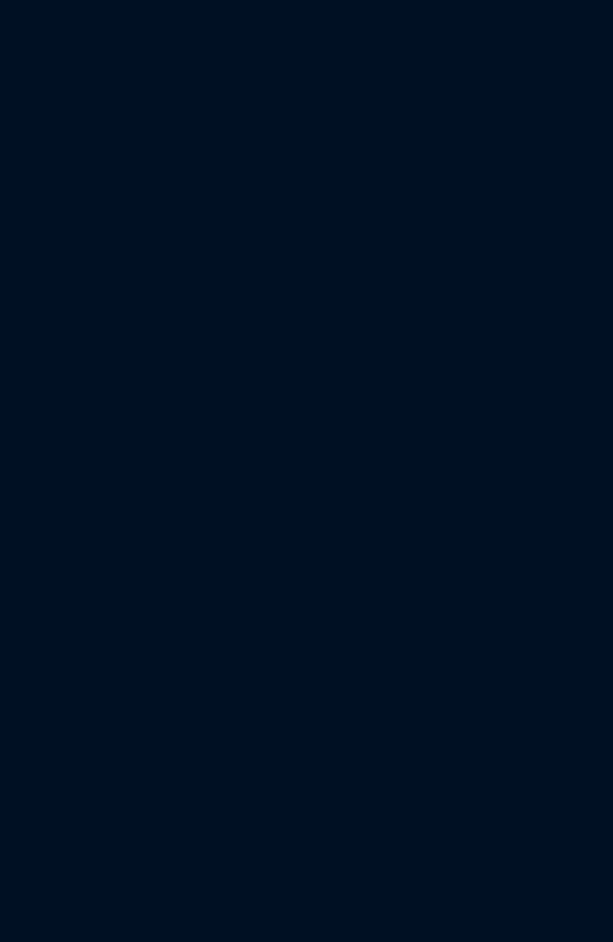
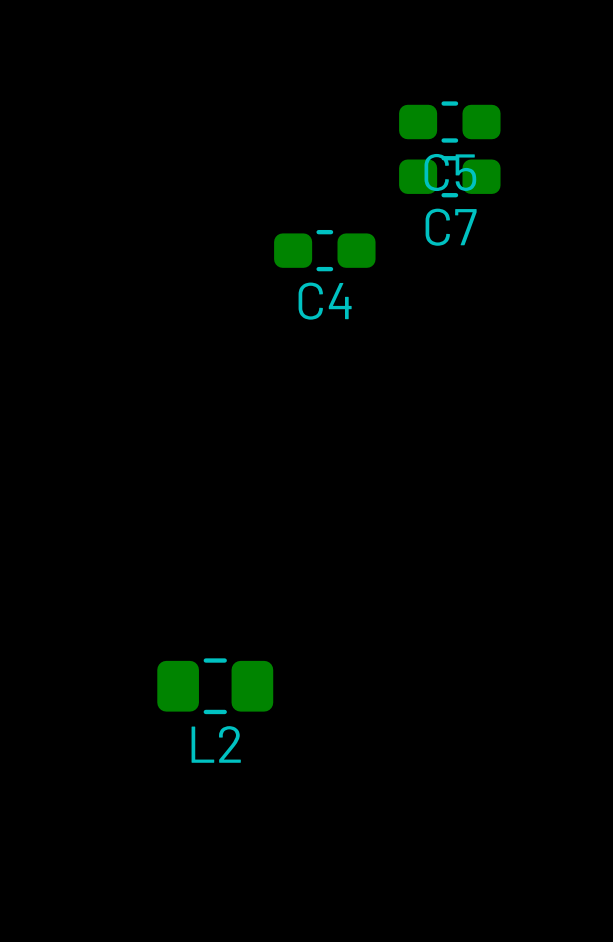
C5: none -> (449, 122)
C7: none -> (449, 176)
C4: none -> (324, 250)
L2: none -> (215, 686)

